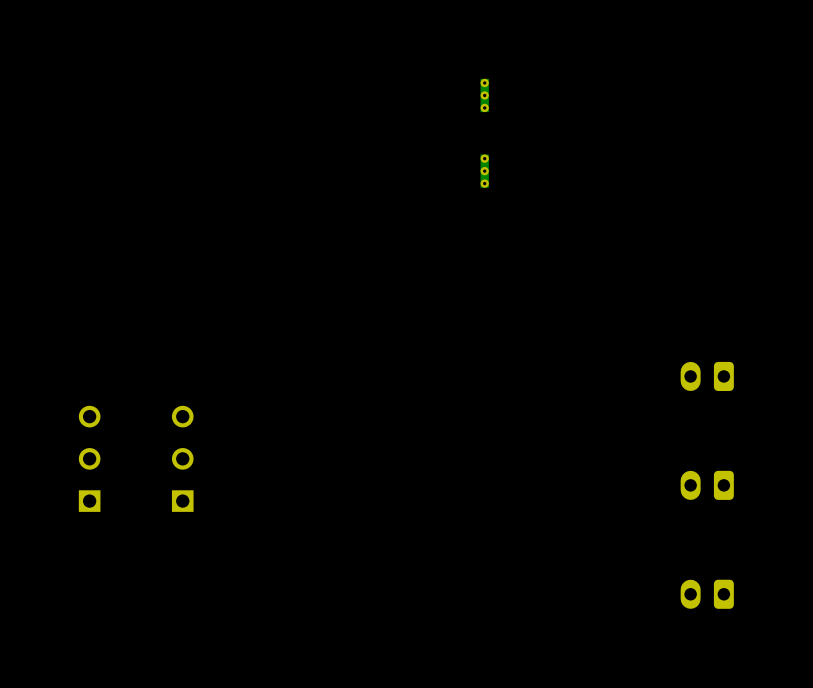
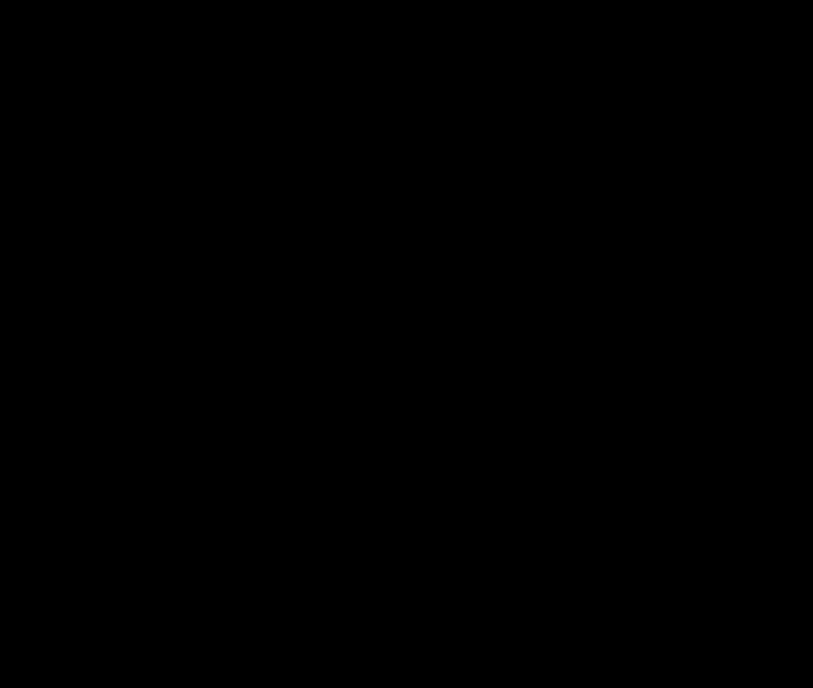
part: (484, 95) -> none
part: (484, 171) -> none
part: (707, 376) -> none
part: (89, 458) -> none
part: (182, 458) -> none
part: (707, 485) -> none
part: (707, 594) -> none

